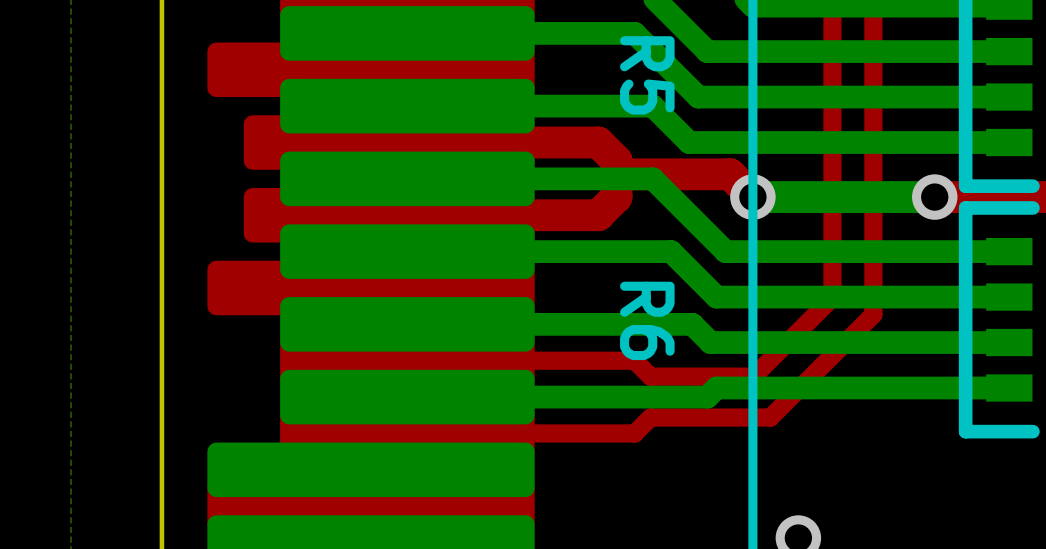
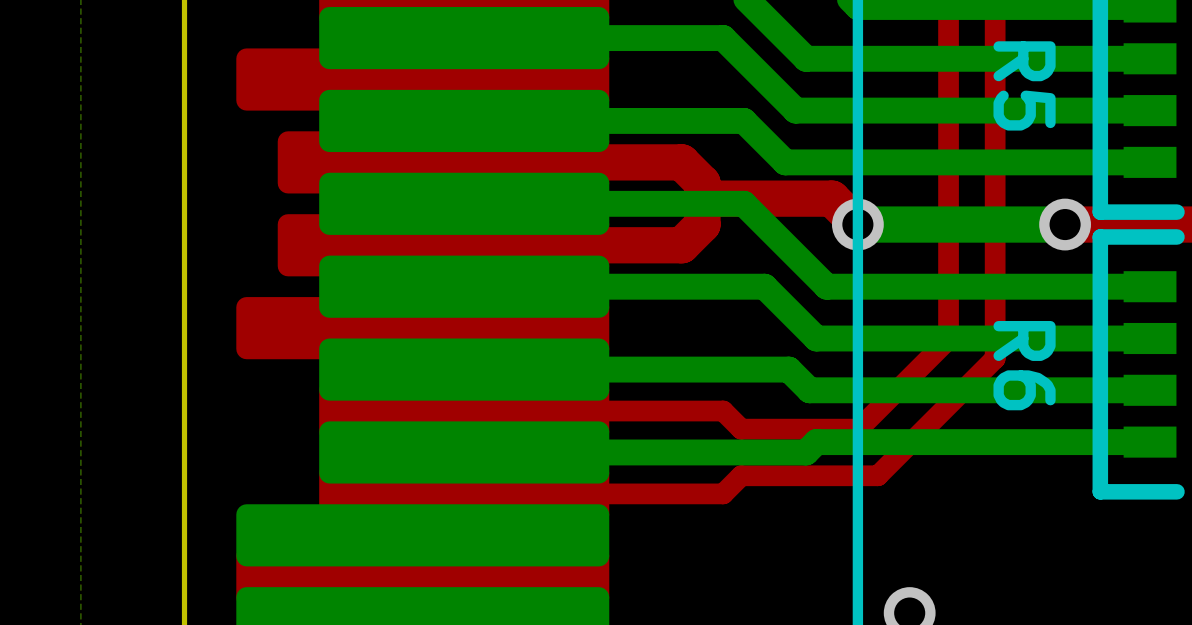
R5 name position: R5 (647, 75) -> R5 (1024, 85)
R6 name position: R6 (647, 320) -> R6 (1024, 365)

